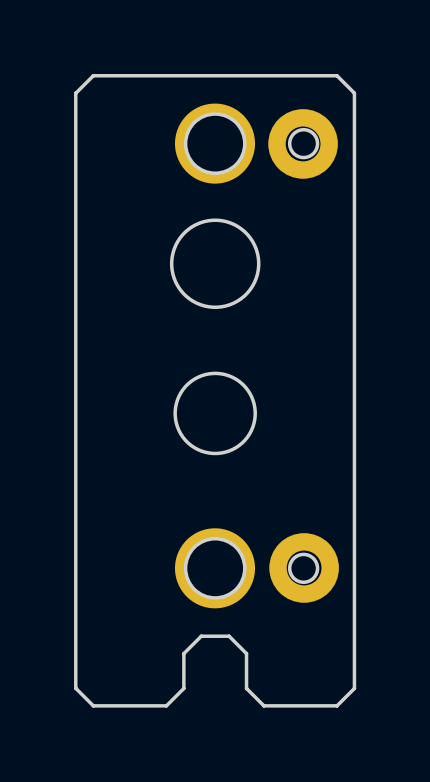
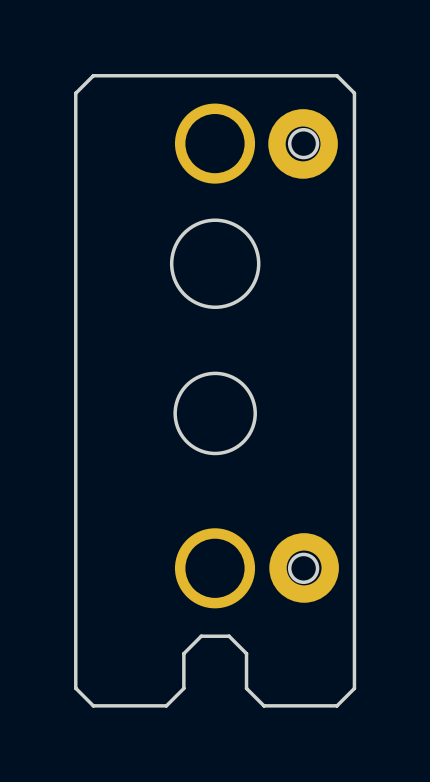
round board edge: [183, 112, 247, 175] -> none
round board edge: [183, 537, 247, 600] -> none

